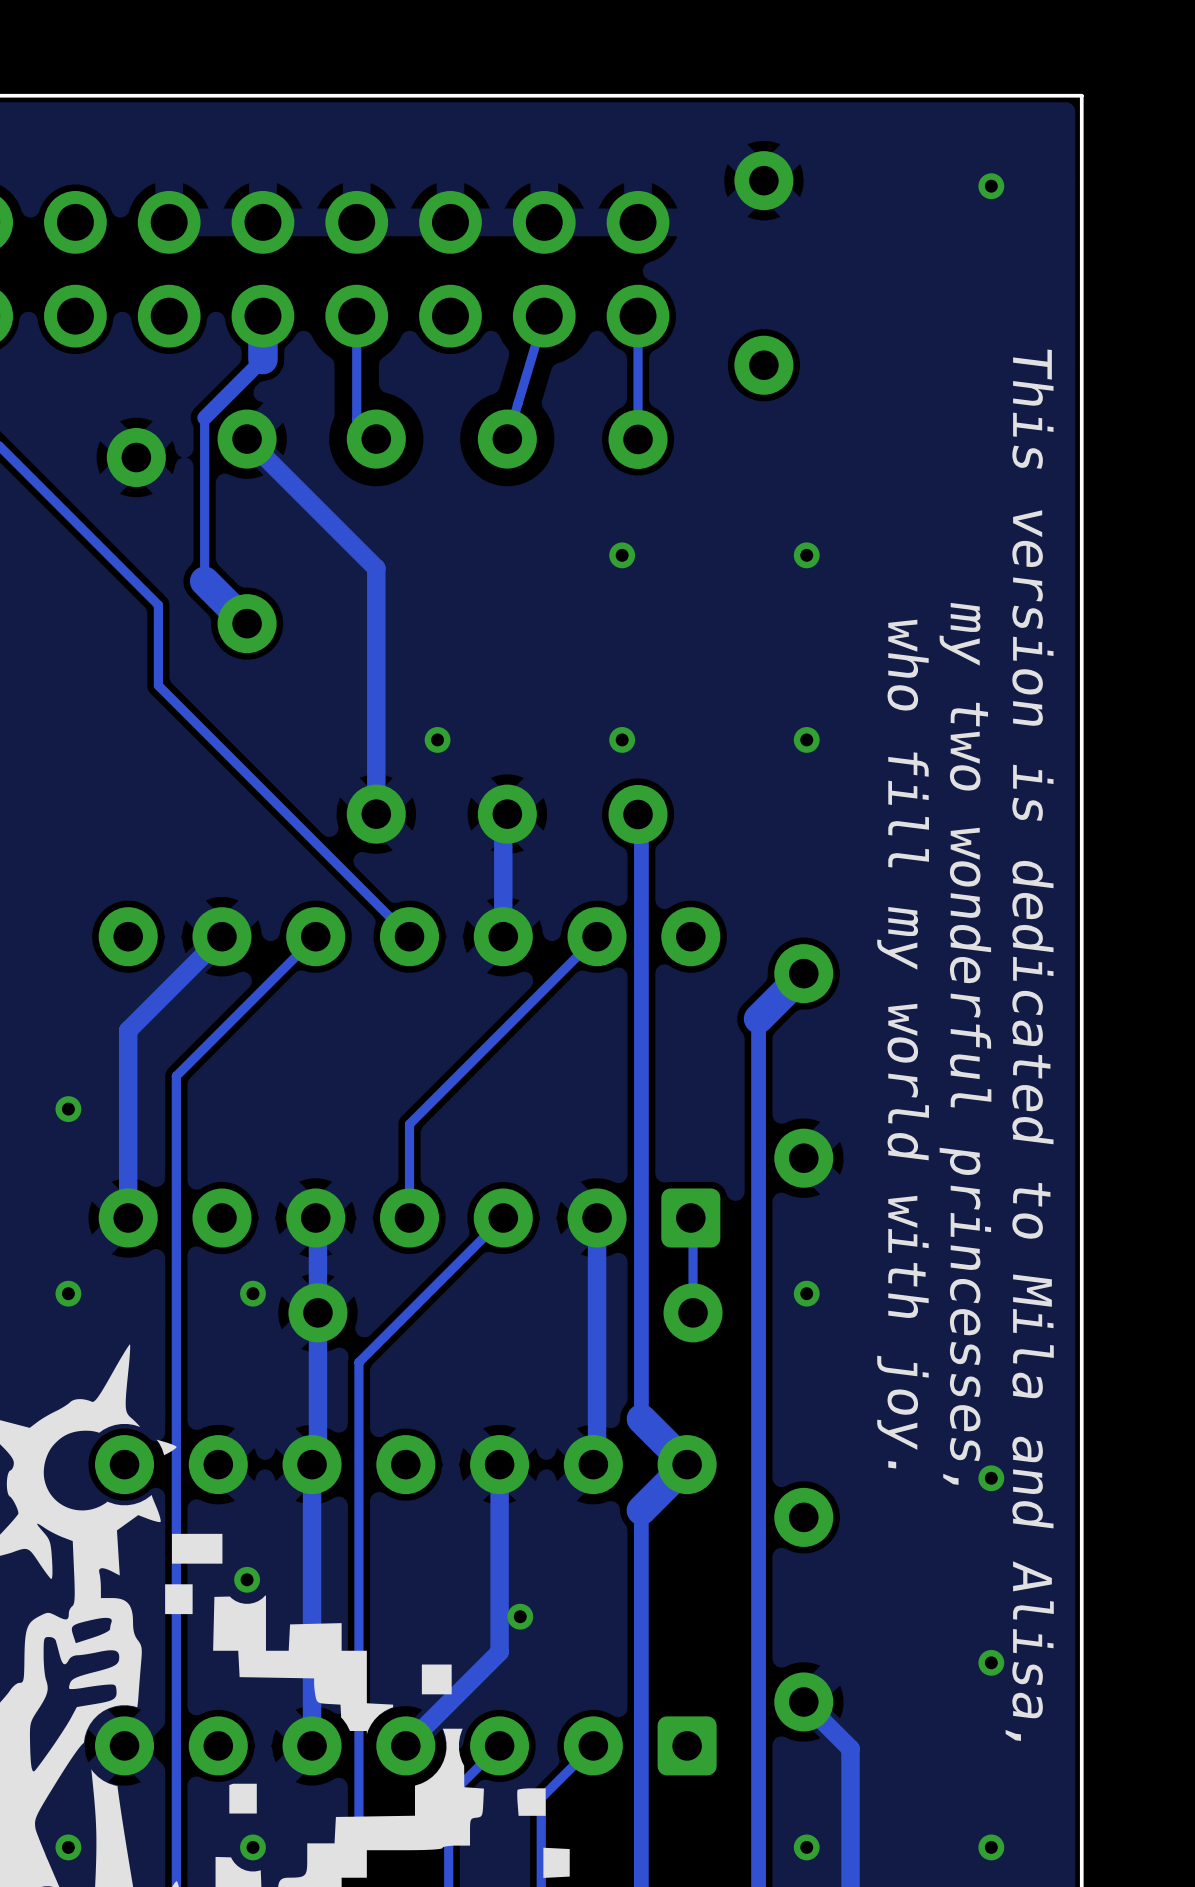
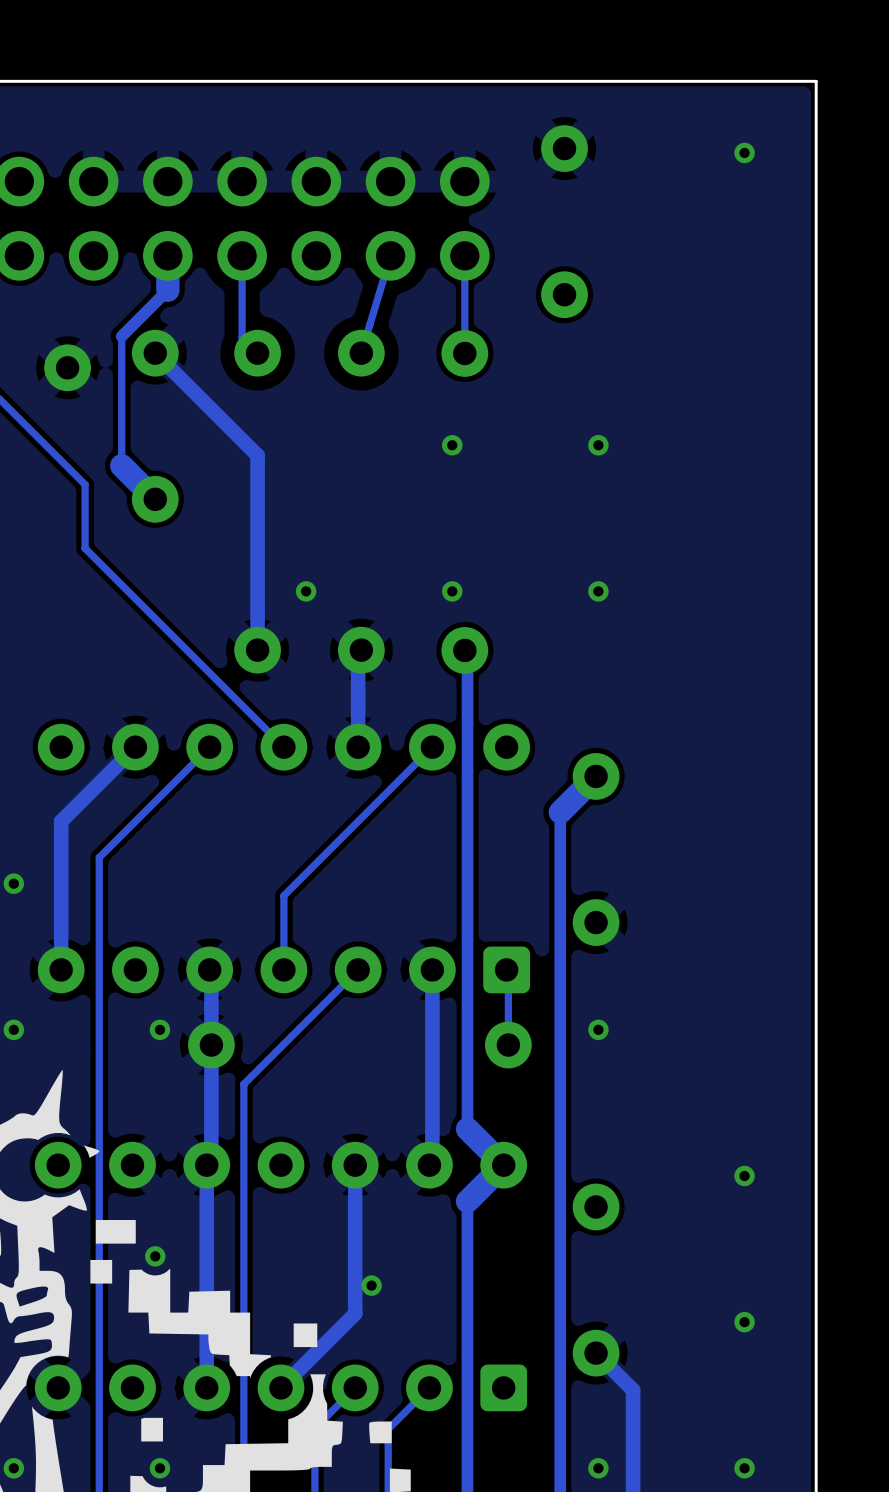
text: my two wonderful princesses, (965, 1043) -> none
text: who fill my world with joy. (903, 1044) -> none
text: This version is dedicated to Mila and Alisa, (1029, 1045) -> none

